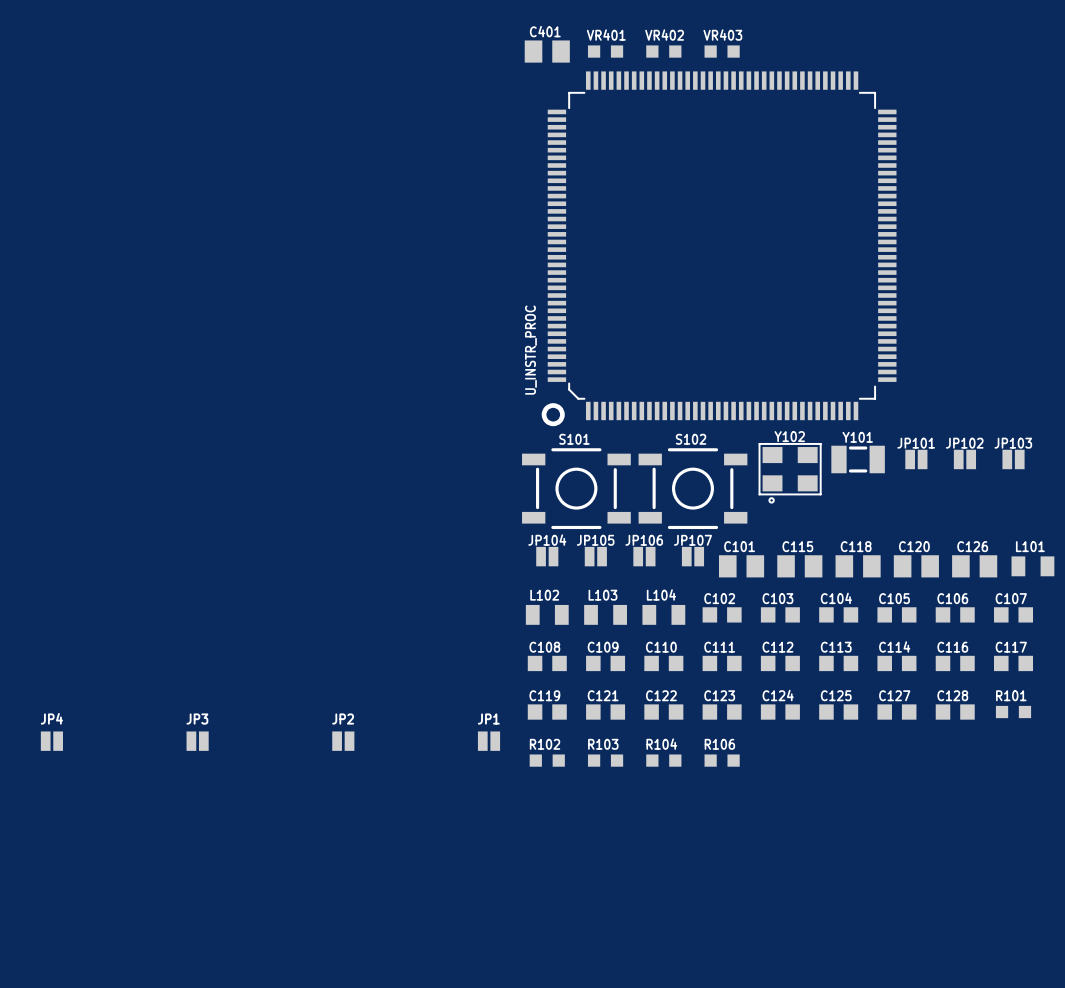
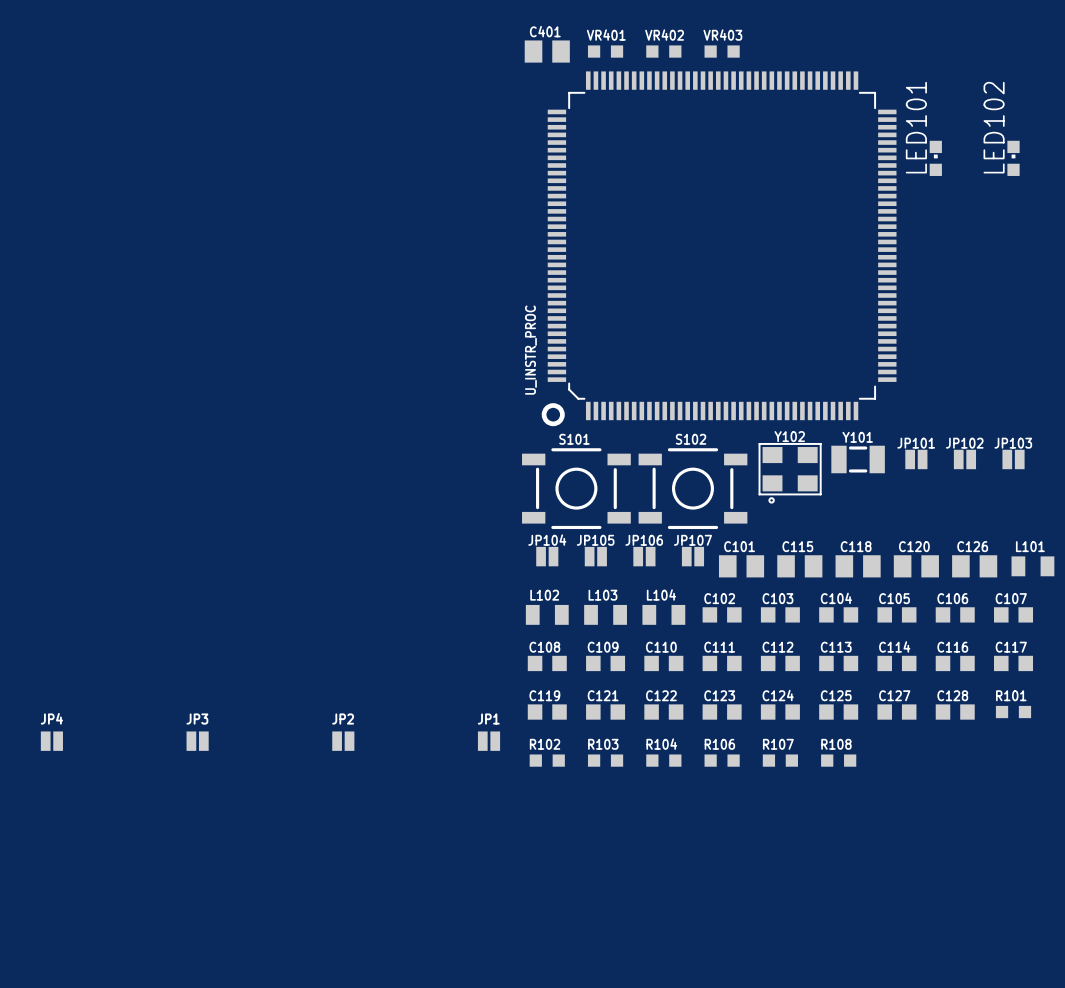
LED101: none -> (935, 158)
LED102: none -> (1013, 158)
R107: none -> (780, 760)
R108: none -> (838, 760)

